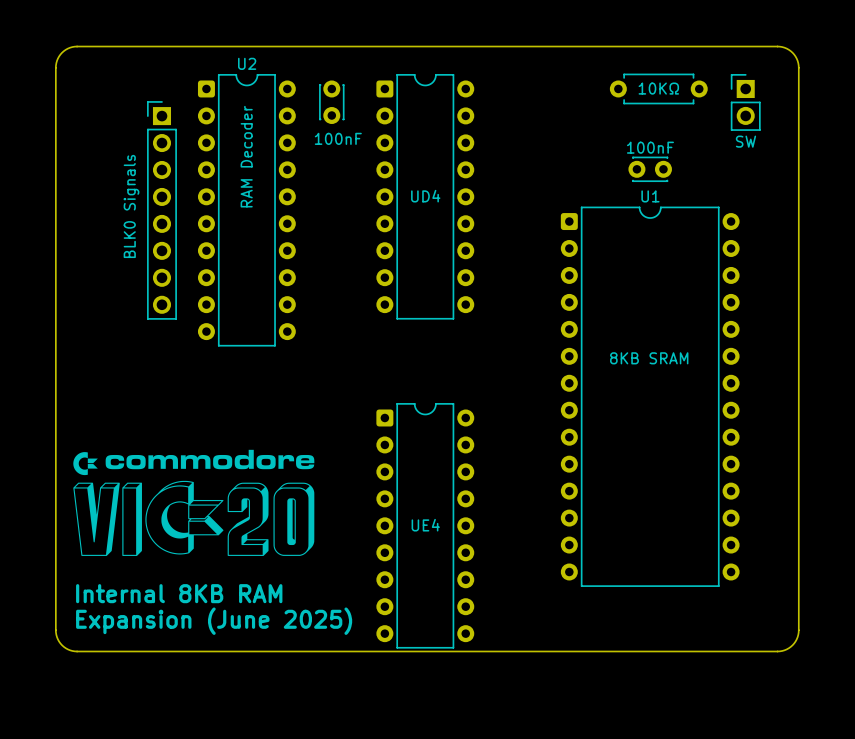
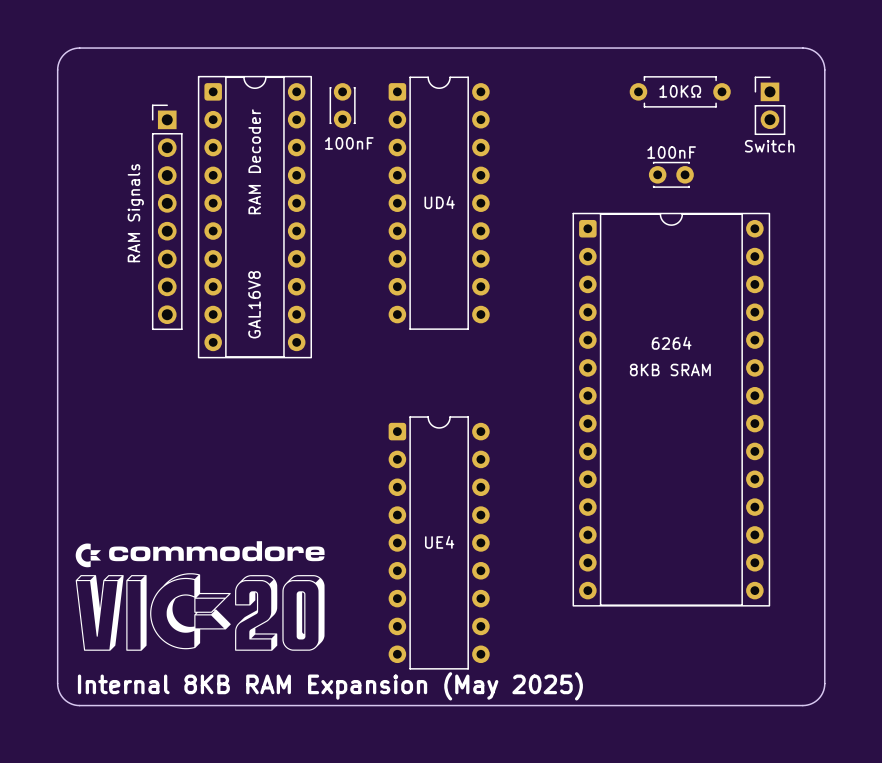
part value: SW (745, 141) -> Switch (769, 146)
part value: BLK0 Signals (131, 206) -> RAM Signals (135, 213)
U2: (246, 210) -> none
part: none -> GAL16V8 (254, 217)
U1: (650, 396) -> none
part: none -> 6264 (671, 409)
drawing position: (193, 502) -> (200, 595)
text: Internal 8KB RAM (179, 593) -> none
text: Expansion (June 2025) (214, 621) -> none
board edge: (55, 630) (57, 637) (62, 645) (67, 649) (77, 651) (777, 651) (786, 649) (792, 645) (796, 639) (798, 630) -> (57, 650) (58, 690) (65, 700) (79, 705) (805, 705) (816, 700) (823, 690) (824, 650)
text: none -> Internal 8KB RAM Expansion (May 2025) (330, 686)

